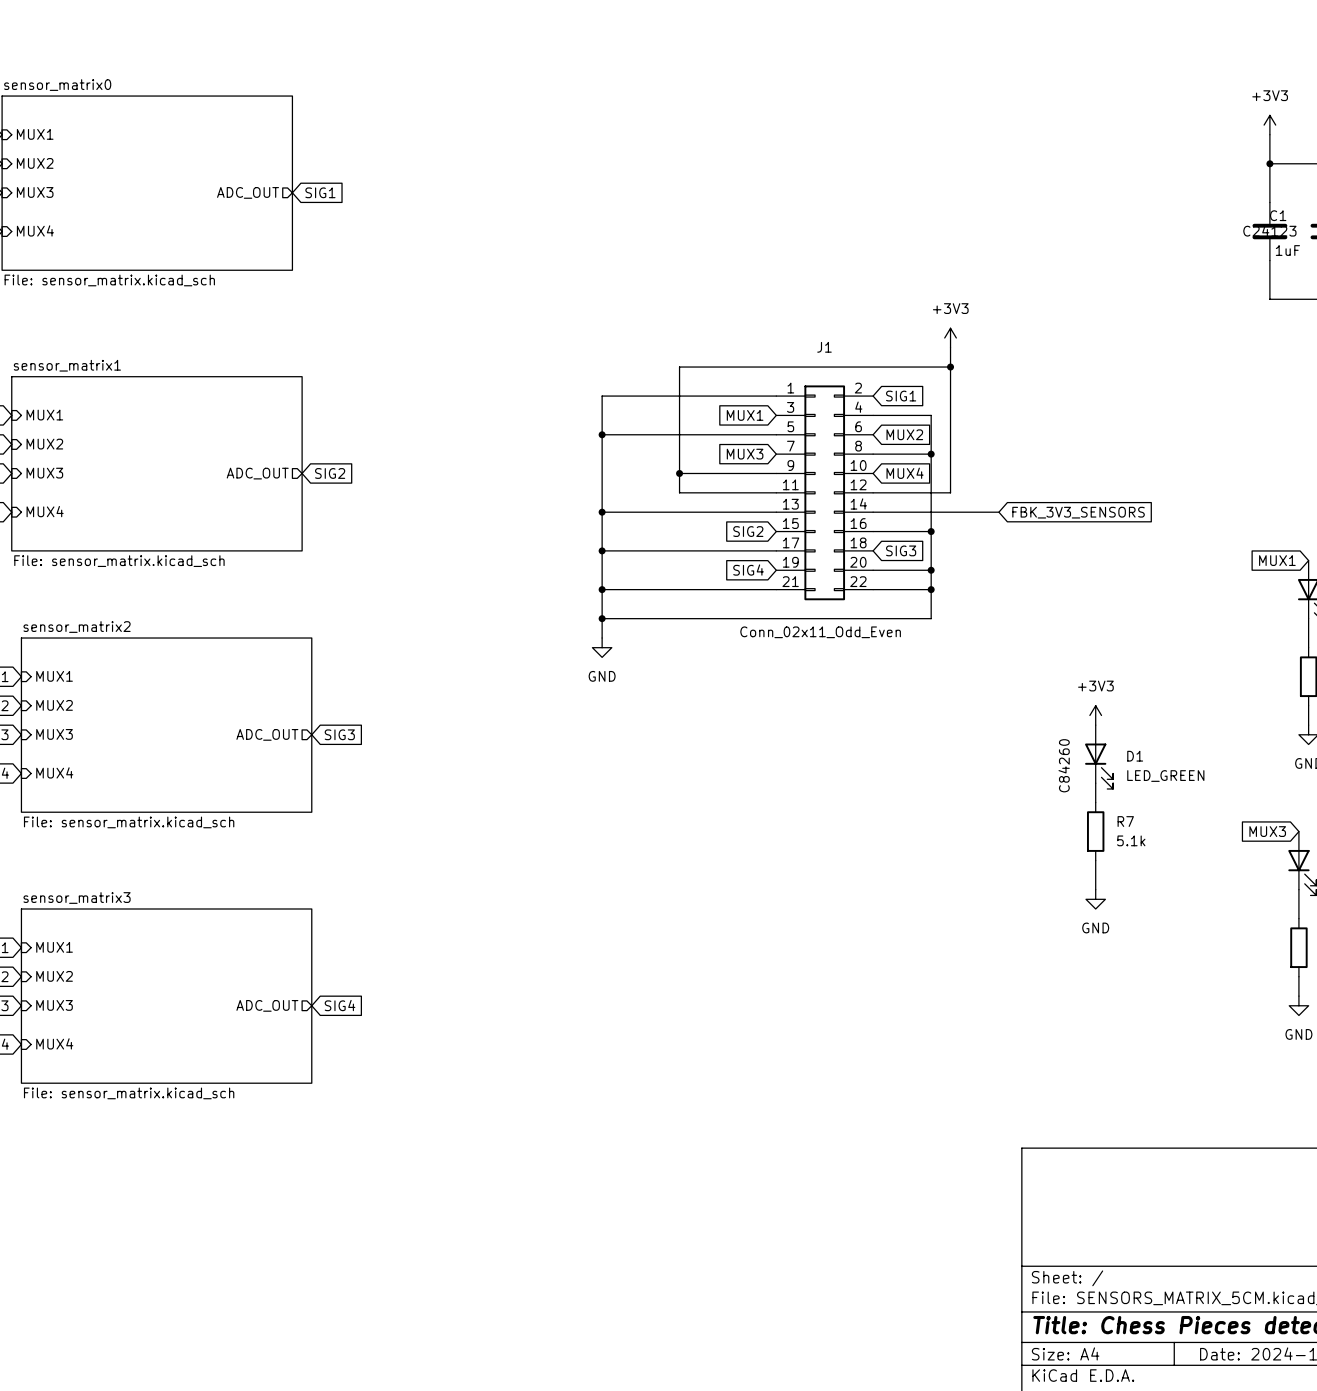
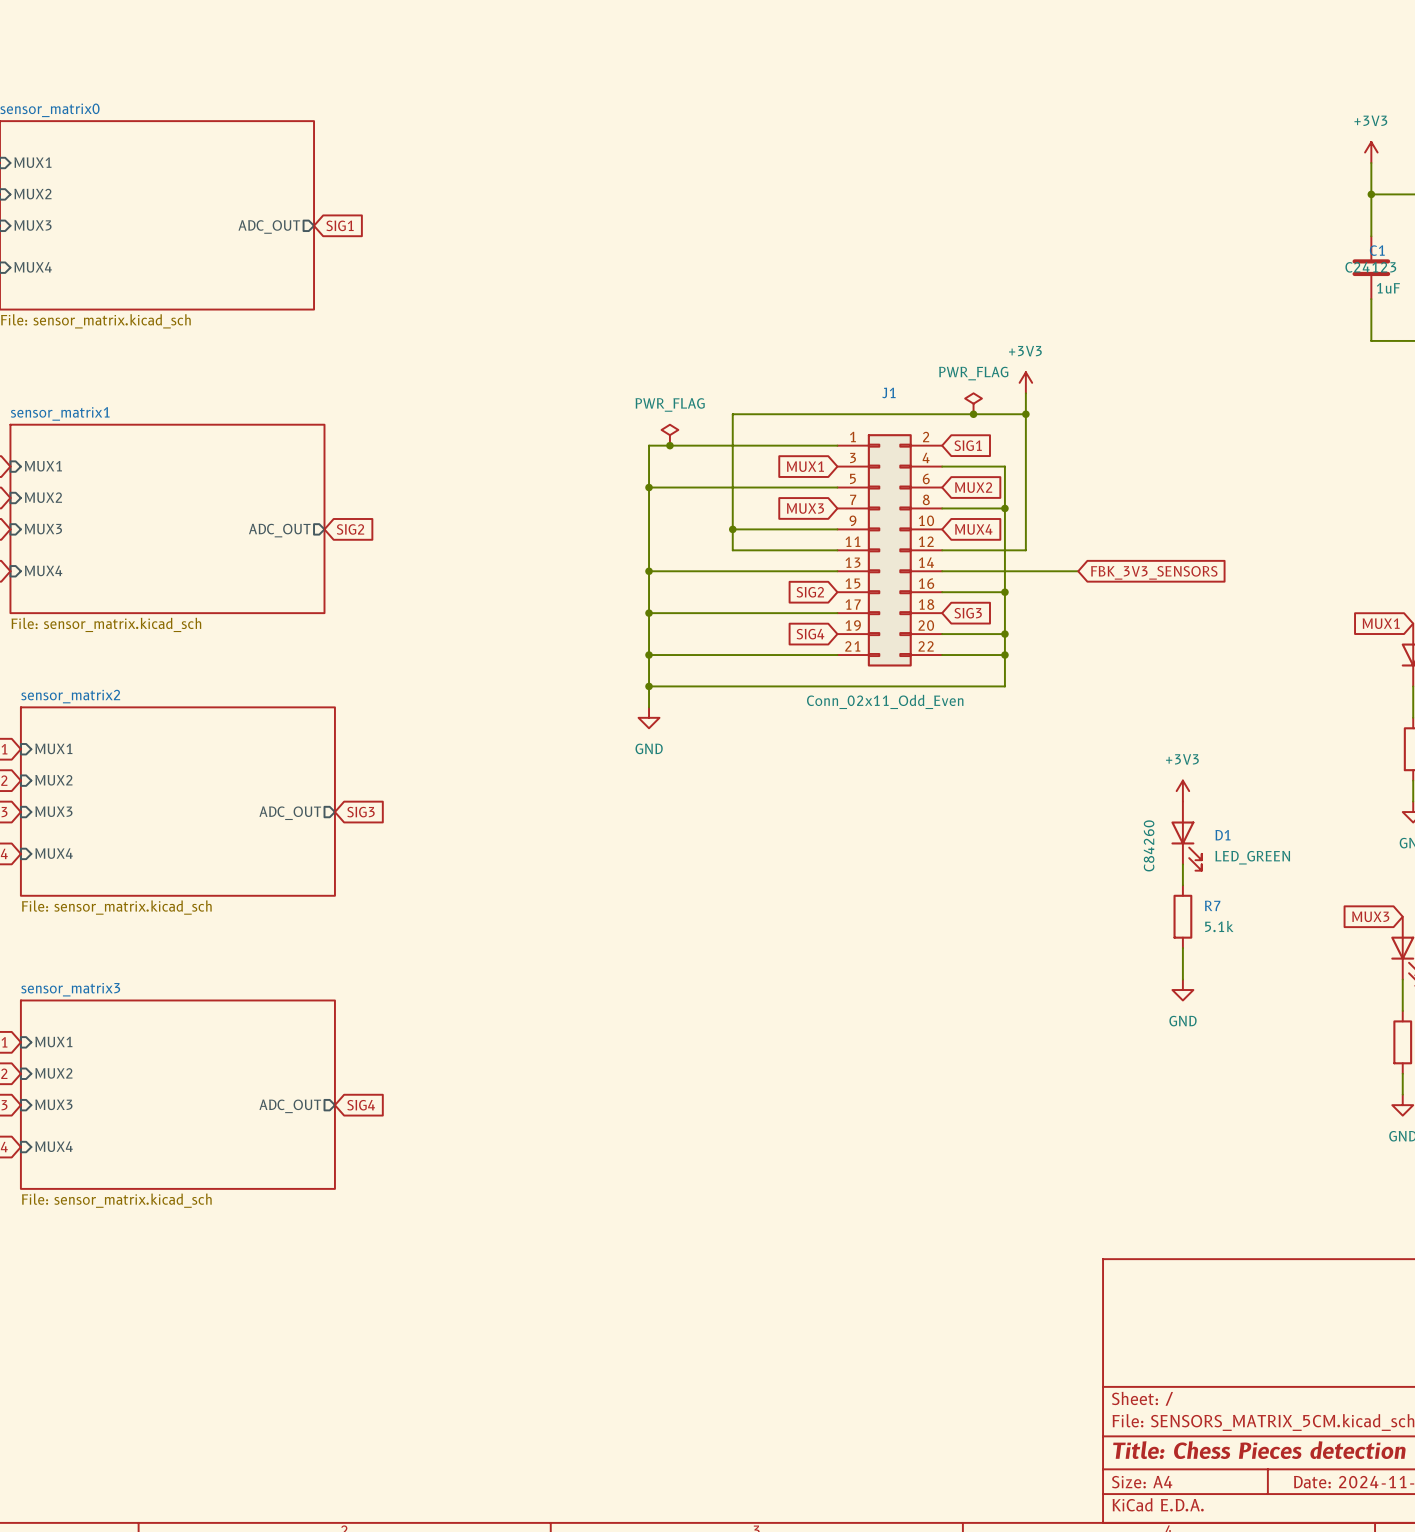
power symbol: none -> PWR_FLAG (973, 403)
junction: none -> (973, 414)
power symbol: none -> PWR_FLAG (669, 435)
junction: none -> (669, 445)

